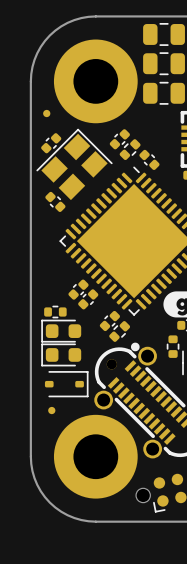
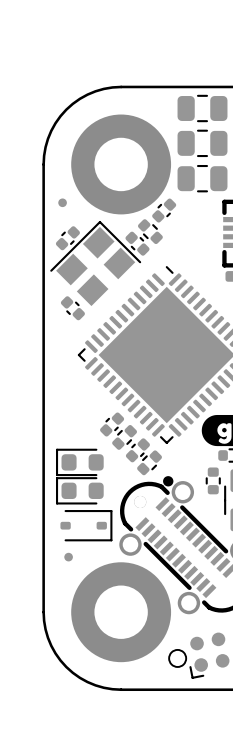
part: none -> (164, 210)
part footprint: [109, 129, 130, 150] -> [137, 219, 163, 245]
part: none -> (137, 243)
part position: (130, 149) -> (124, 437)
part: (149, 159) -> none
part: (78, 289) -> none
part: (55, 312) -> none

